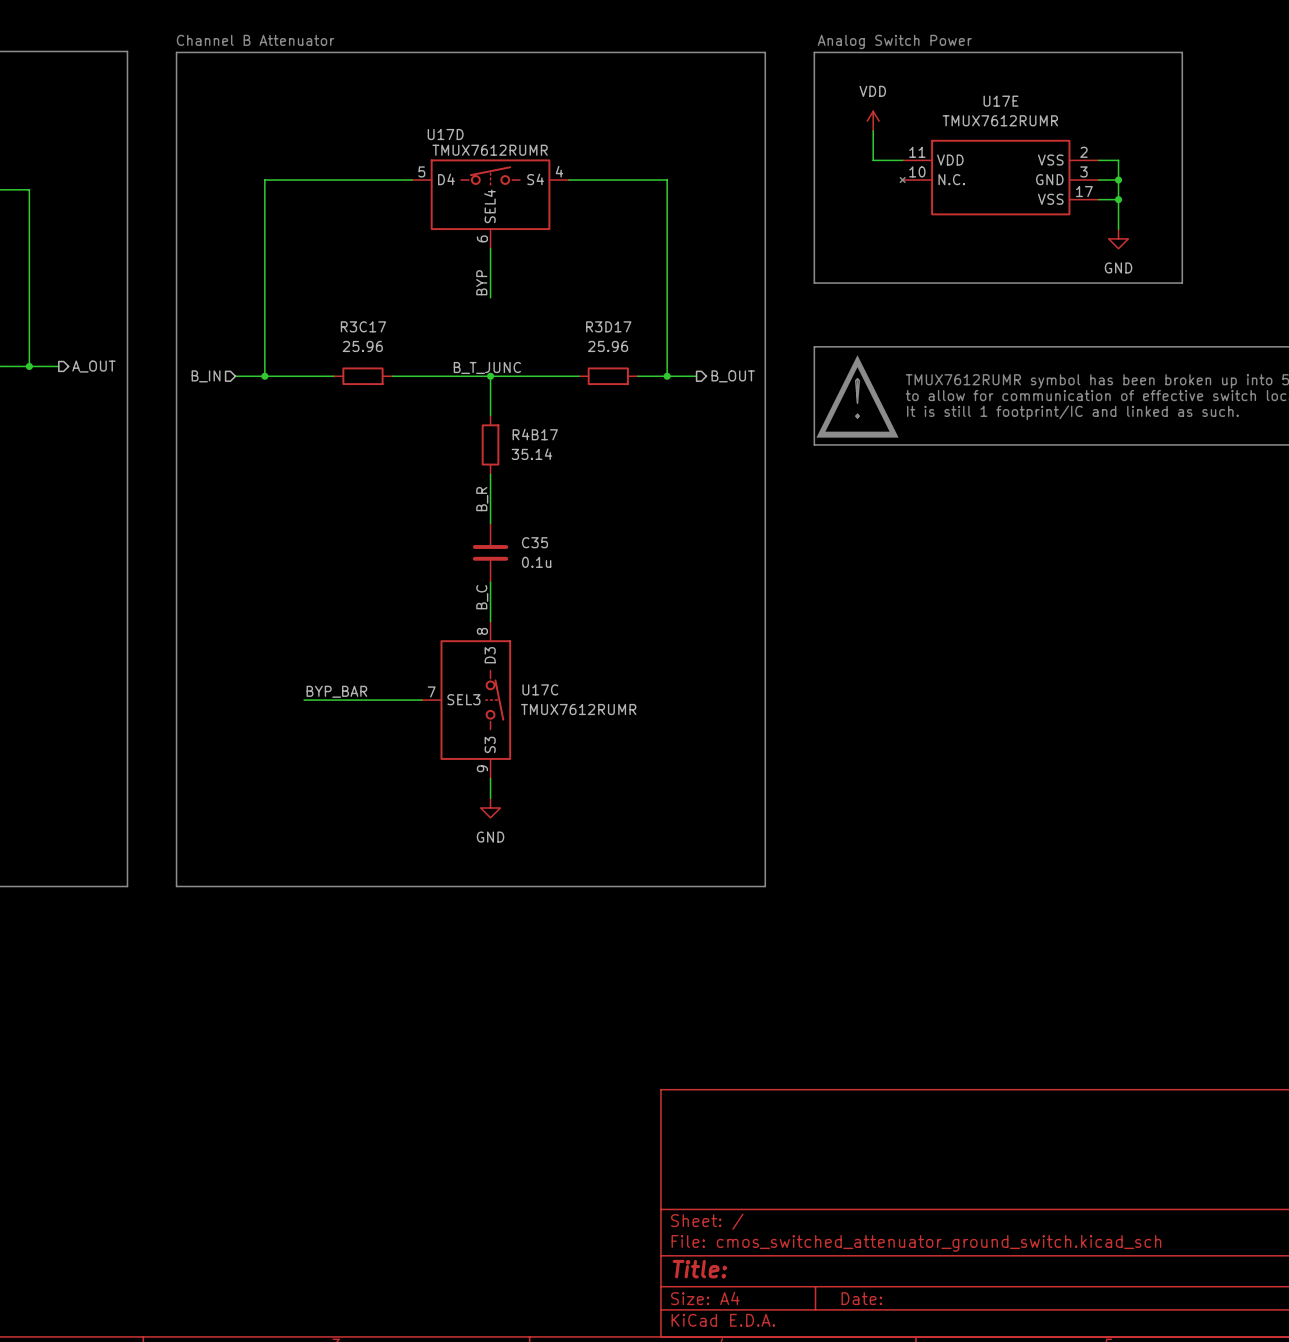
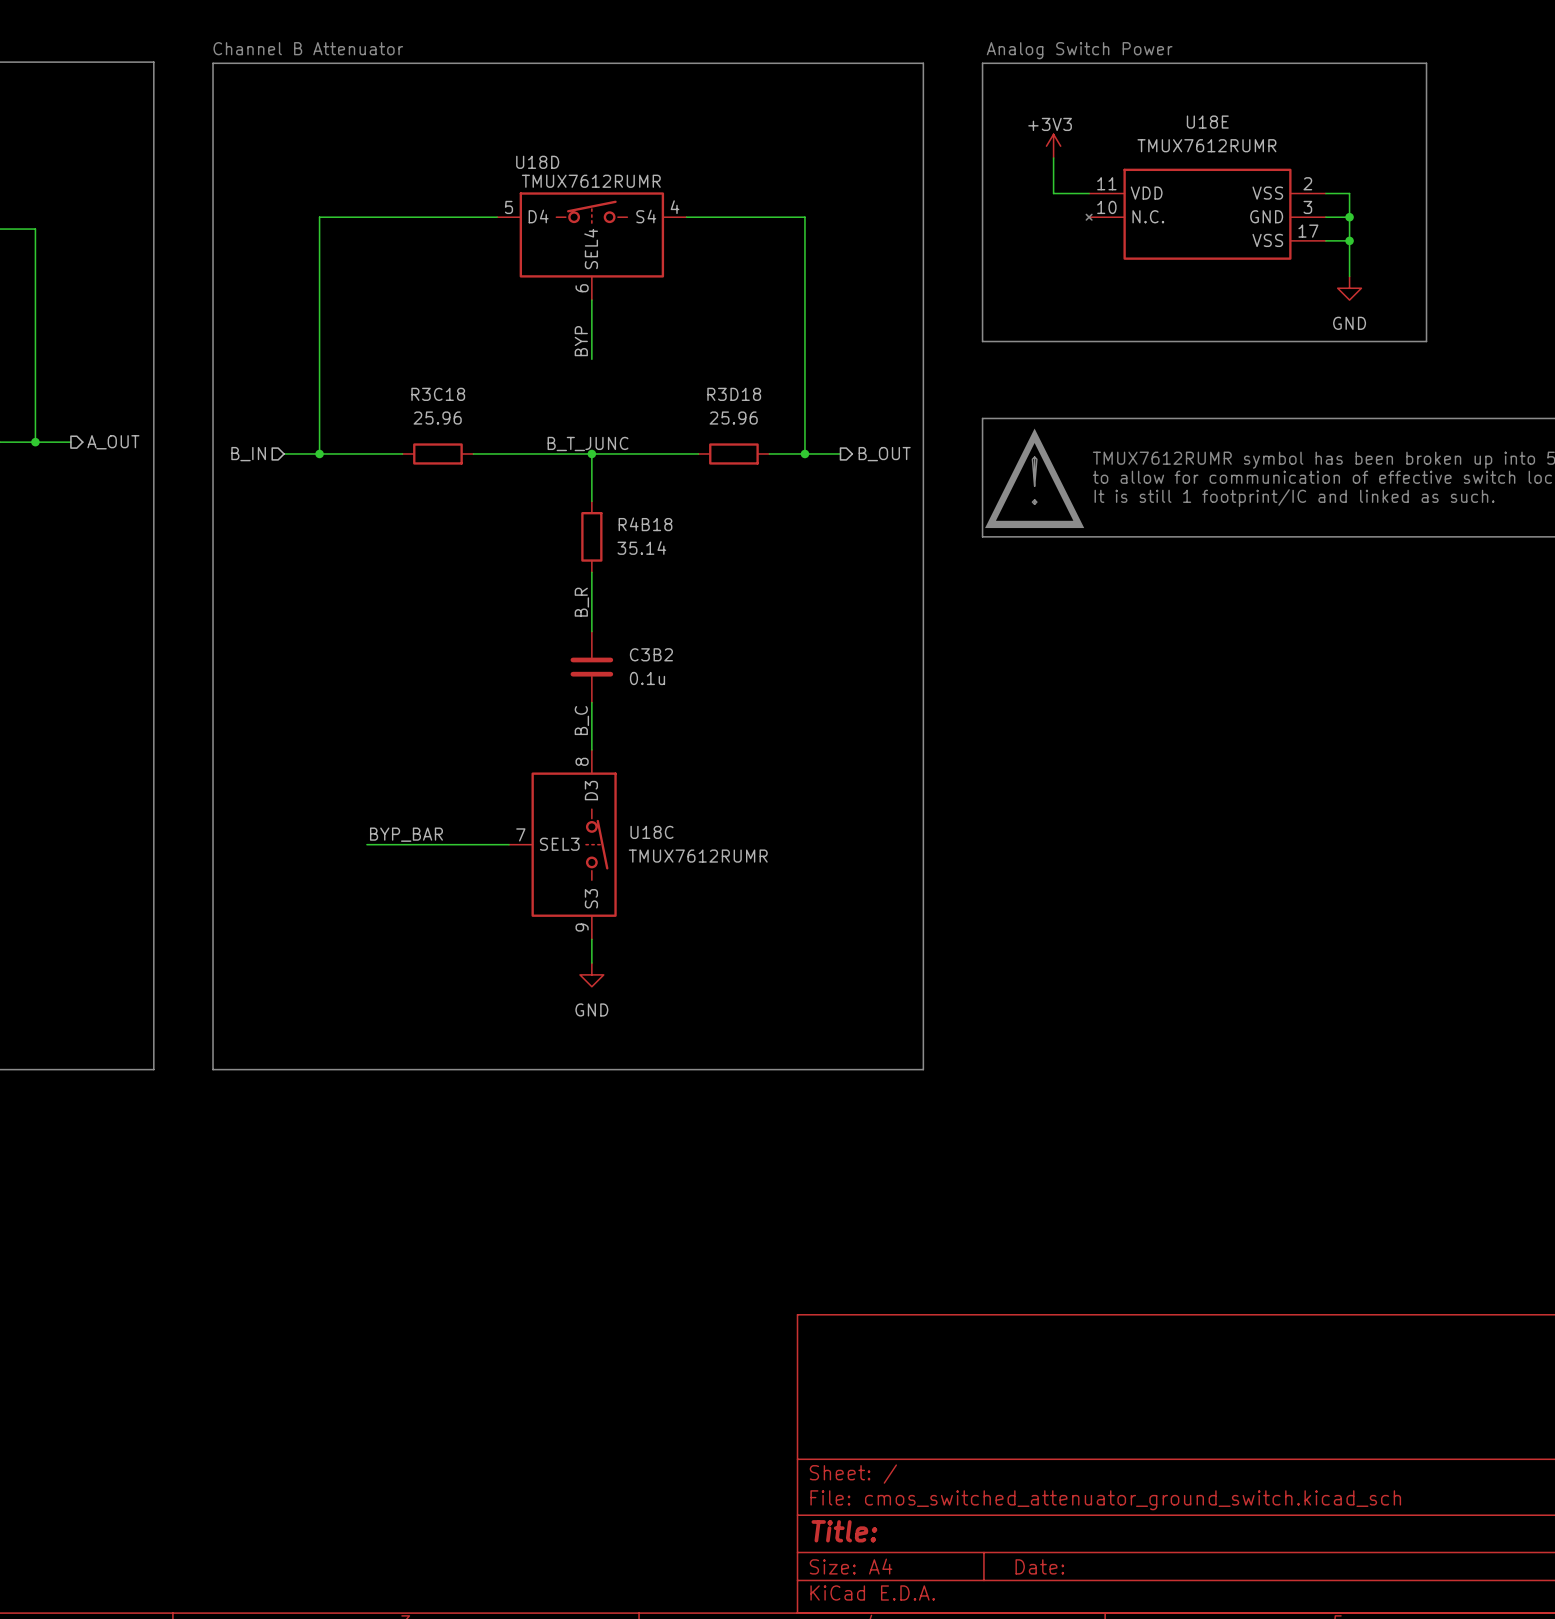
U17E name: U17E (1001, 101) -> U18E (1207, 122)
power symbol: VDD (873, 121) -> +3V3 (1053, 146)
U17D name: U17D (445, 134) -> U18D (537, 162)
R3C17 name: R3C17 (363, 326) -> R3C18 (438, 394)
R3D17 name: R3D17 (608, 326) -> R3D18 (734, 394)
R4B17 name: R4B17 (535, 434) -> R4B18 (645, 524)
C35 name: C35 (535, 542) -> C3B2 (651, 654)
U17C name: U17C (540, 689) -> U18C (651, 832)

